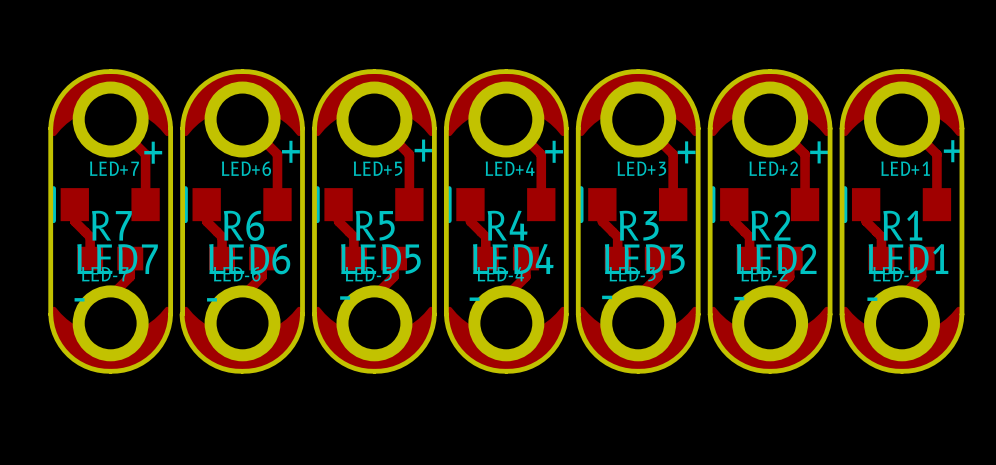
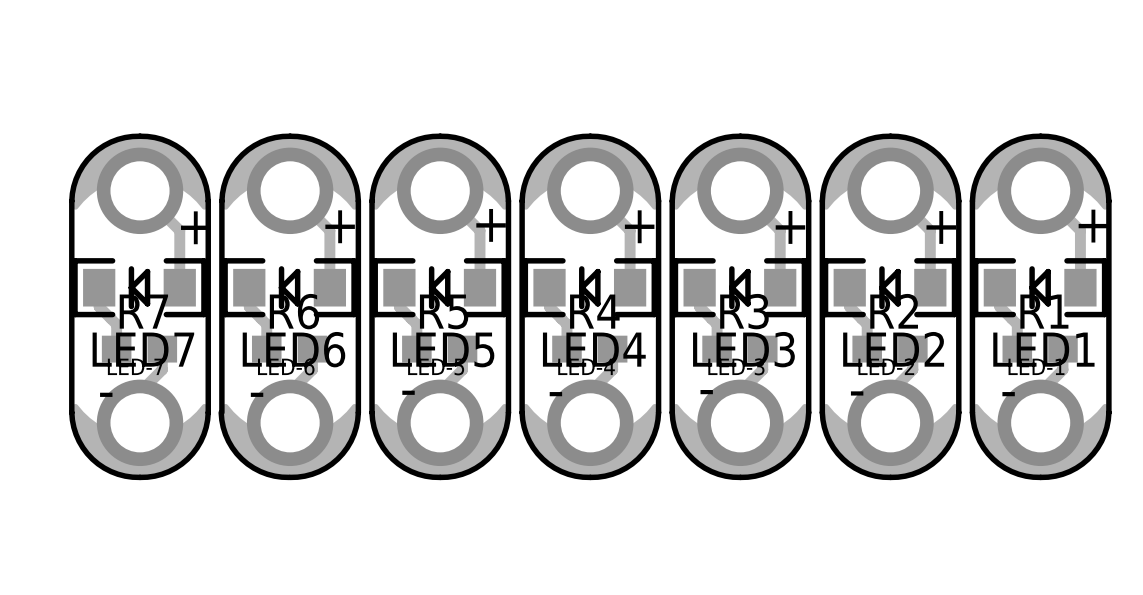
LED+7 name: LED+7 (114, 168) -> none
LED+6 name: LED+6 (246, 168) -> none
LED+5 name: LED+5 (378, 168) -> none
LED+4 name: LED+4 (510, 168) -> none
LED+3 name: LED+3 (641, 168) -> none
LED+2 name: LED+2 (773, 168) -> none
LED+1 name: LED+1 (905, 168) -> none
LED7 footprint: [51, 186, 160, 224] -> [72, 258, 207, 318]
LED6 footprint: [183, 186, 292, 224] -> [222, 258, 357, 318]
LED5 footprint: [314, 186, 424, 224] -> [372, 258, 507, 318]
LED4 footprint: [446, 186, 556, 224] -> [522, 258, 658, 318]
LED3 footprint: [578, 186, 688, 224] -> [672, 258, 808, 318]
LED2 footprint: [710, 186, 820, 224] -> [822, 258, 958, 318]
LED1 footprint: [842, 186, 952, 224] -> [972, 258, 1108, 318]

